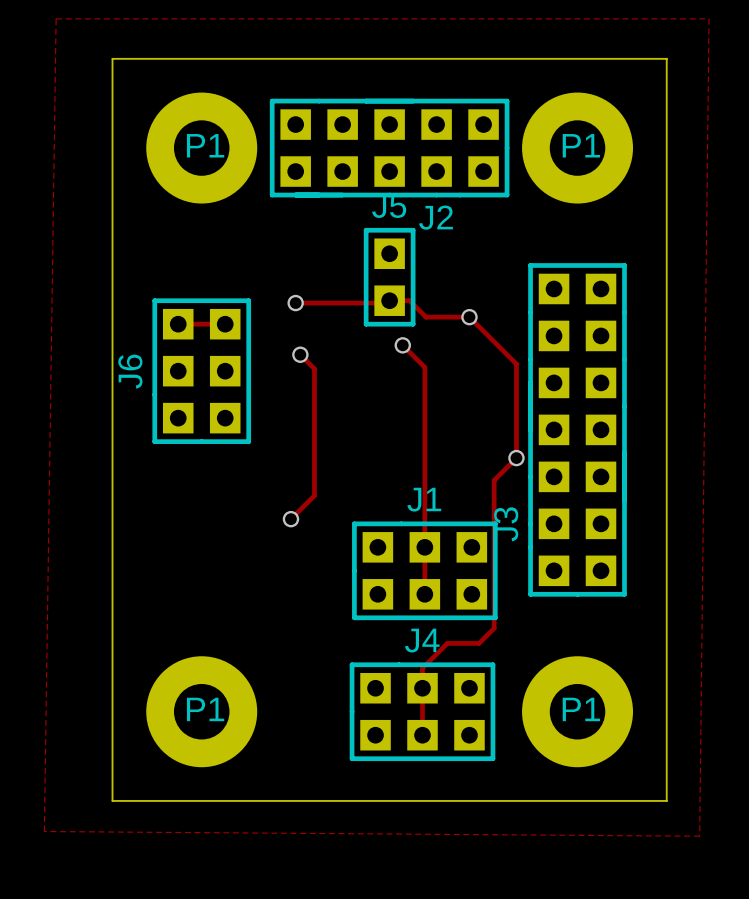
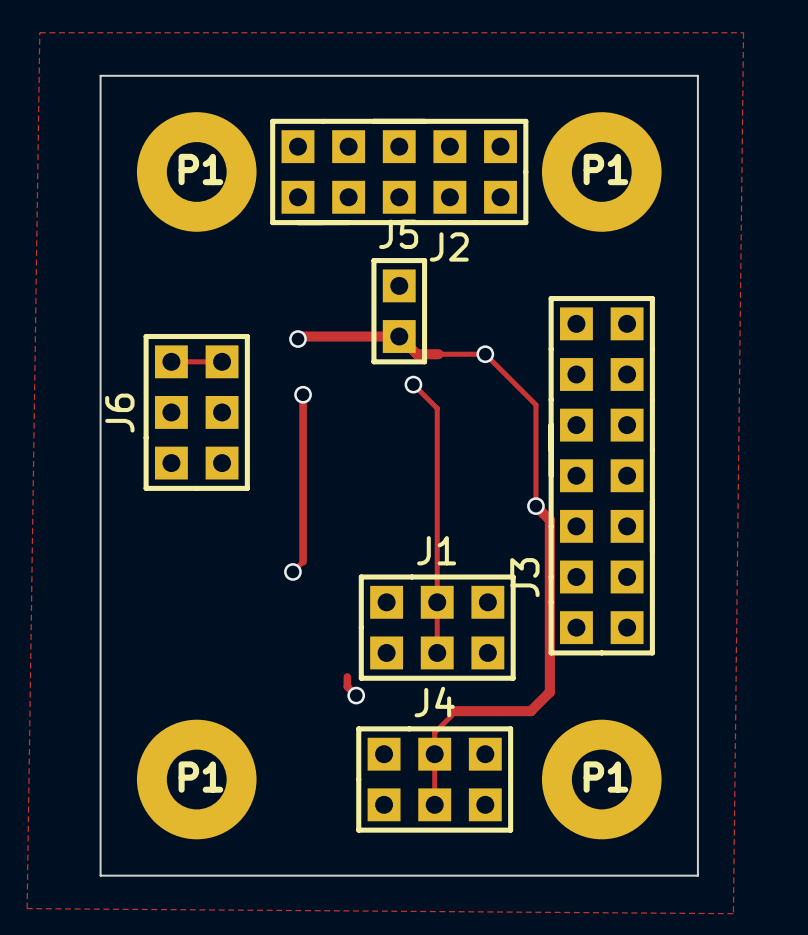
track: (295, 303) (387, 303) (389, 300) (409, 300) (426, 317) -> (298, 339) (300, 336) (399, 336) (416, 354) (438, 354)
track: (300, 354) (314, 368) (314, 495) (300, 509) -> (303, 394) (303, 561)
track: (516, 458) (494, 480) (494, 628) (479, 643) (447, 643) (442, 648) -> (535, 506) (549, 520) (549, 692) (530, 711) (456, 711)
track: none -> (347, 676) (347, 686) (356, 695)
via: none -> (356, 695)

